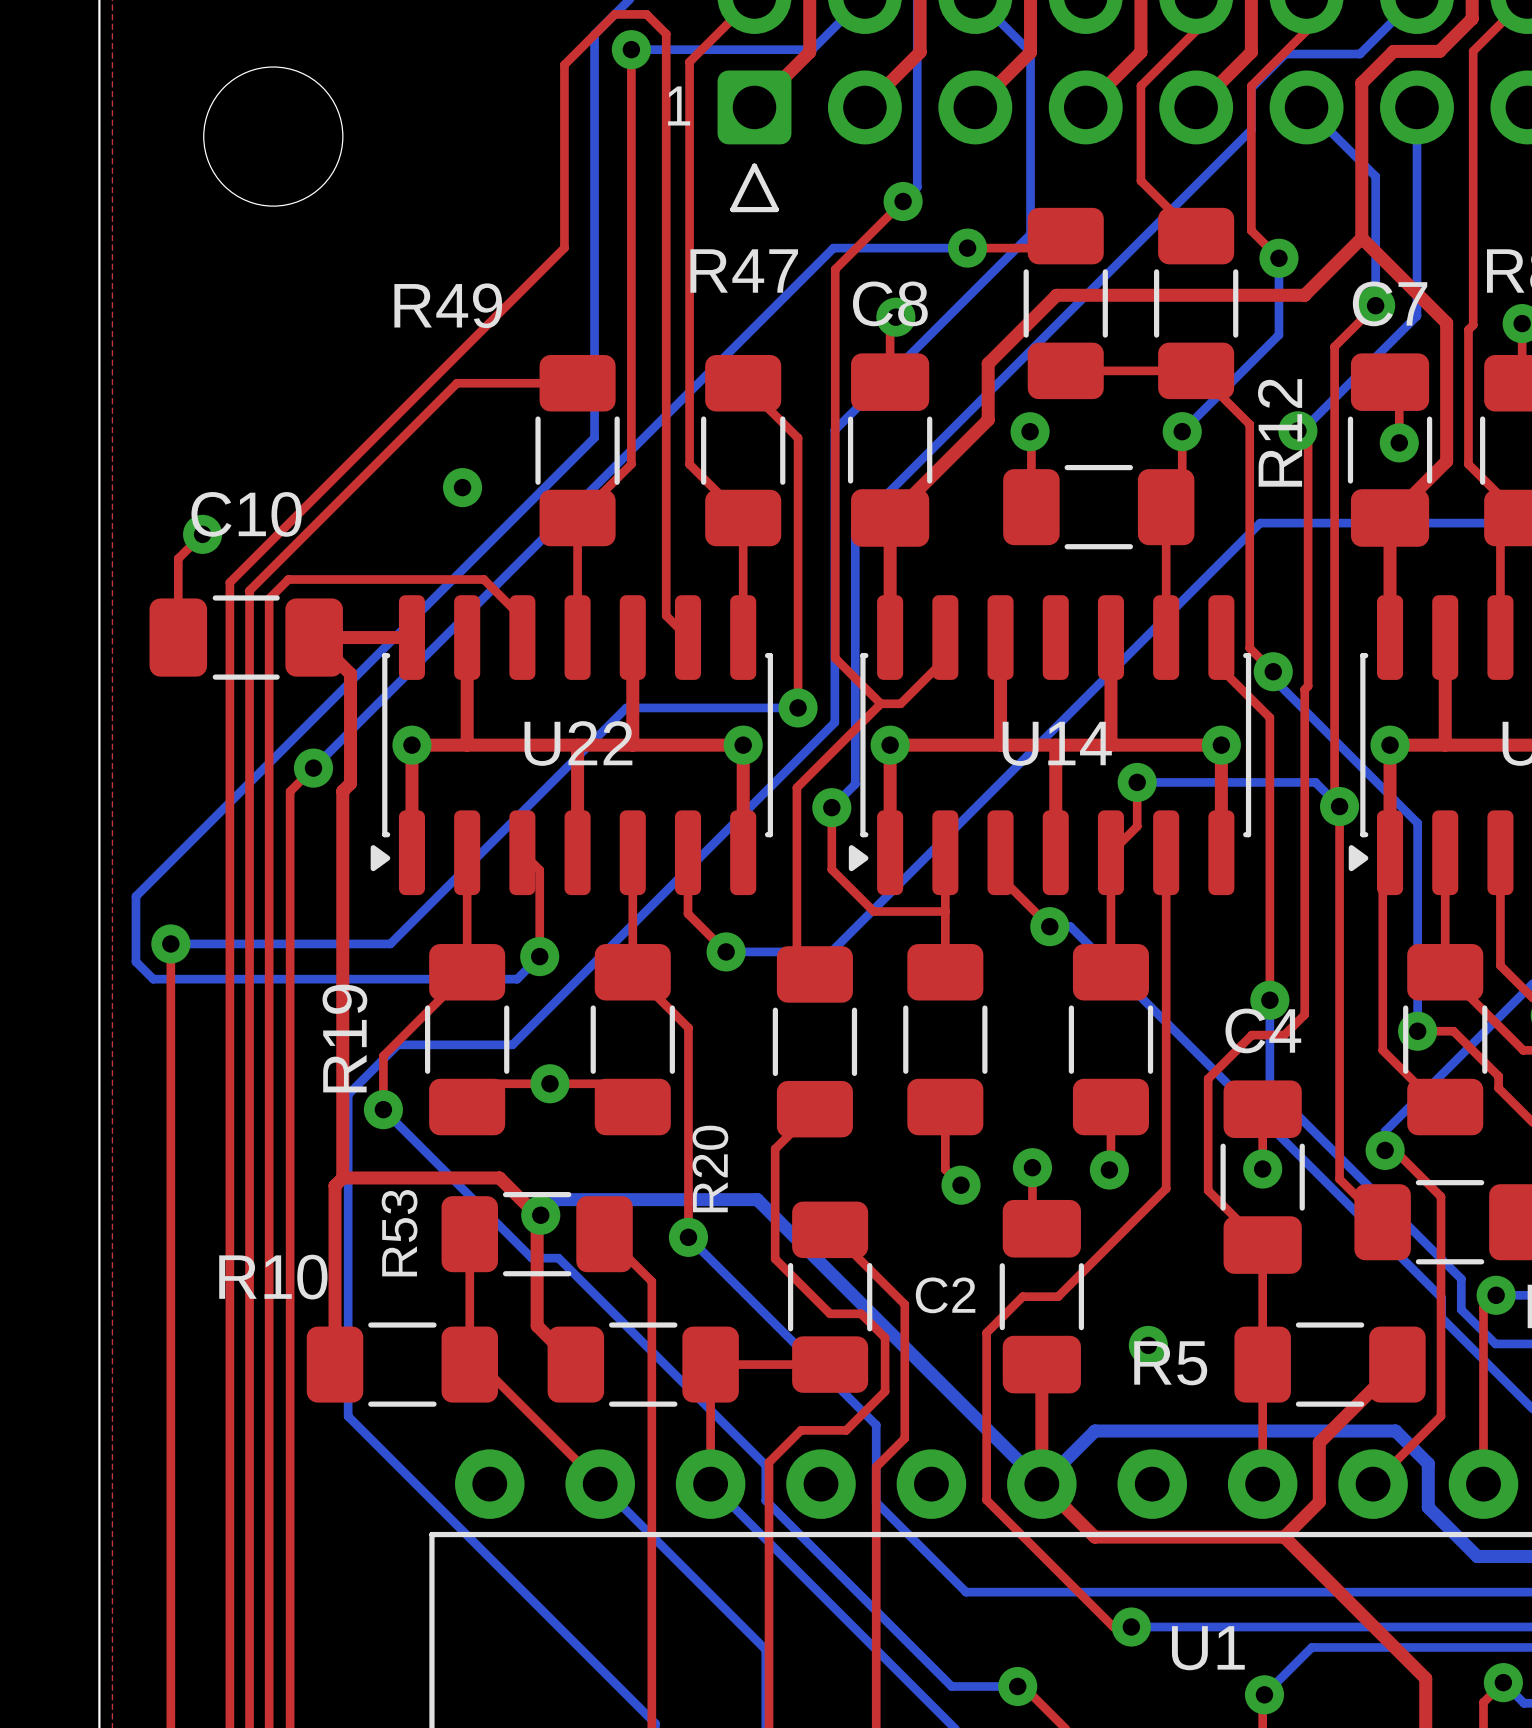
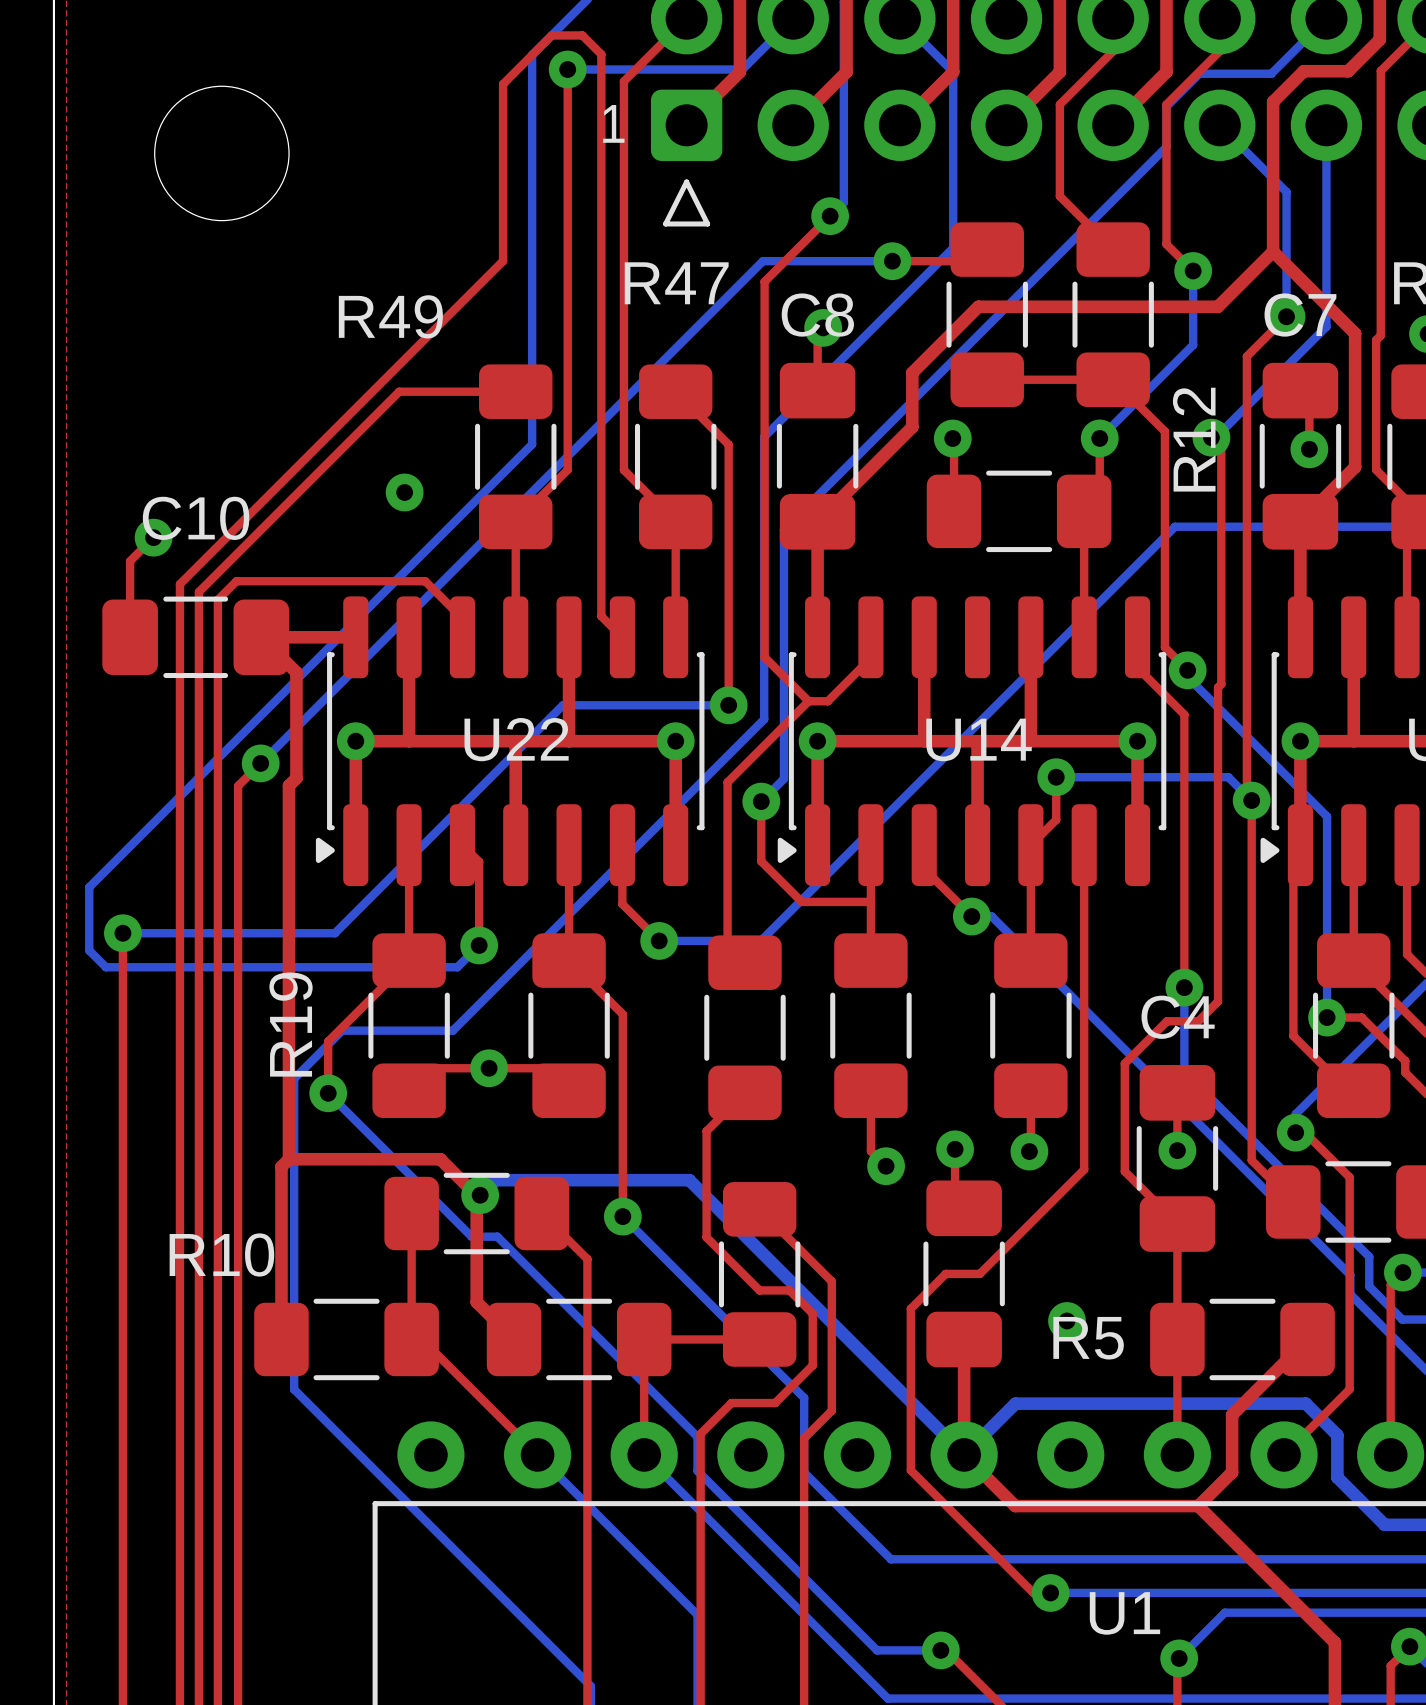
R20 name: R20 (710, 1168) -> none
R53 name: R53 (399, 1233) -> none
C2 name: C2 (945, 1295) -> none

